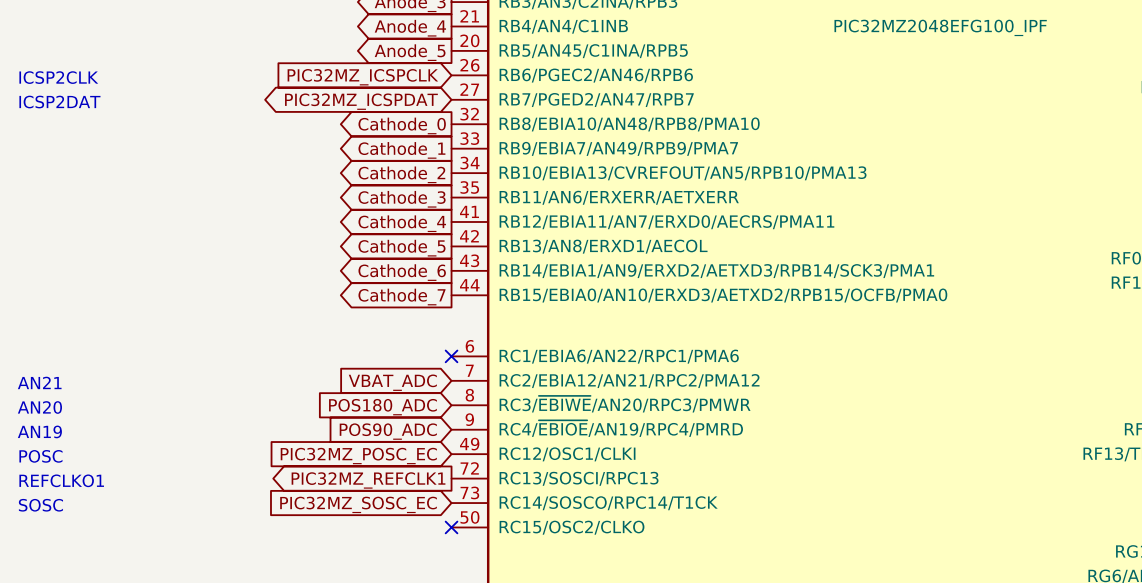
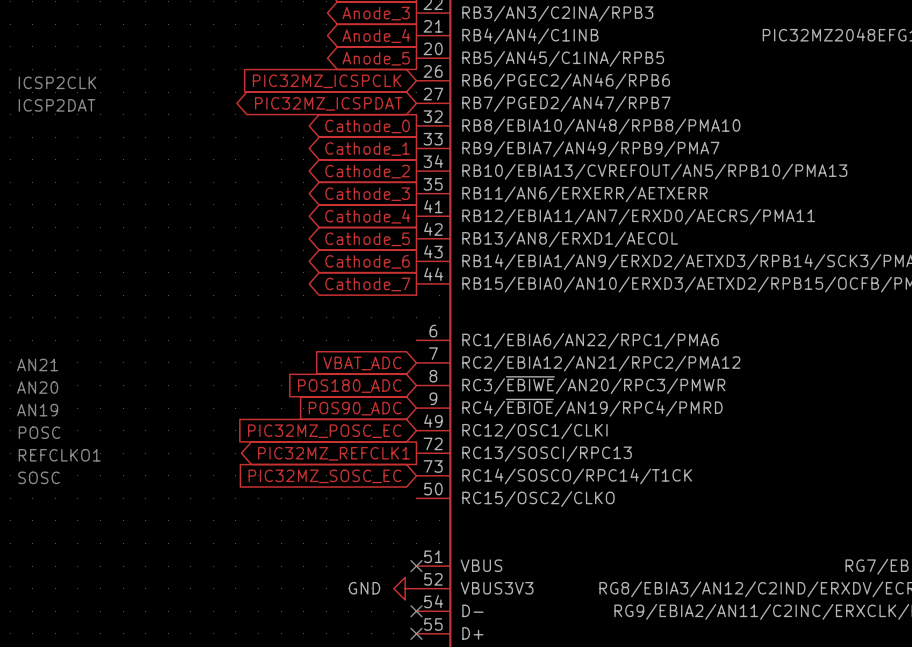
no-connect mark: (451, 356) -> none
no-connect mark: (451, 527) -> none

